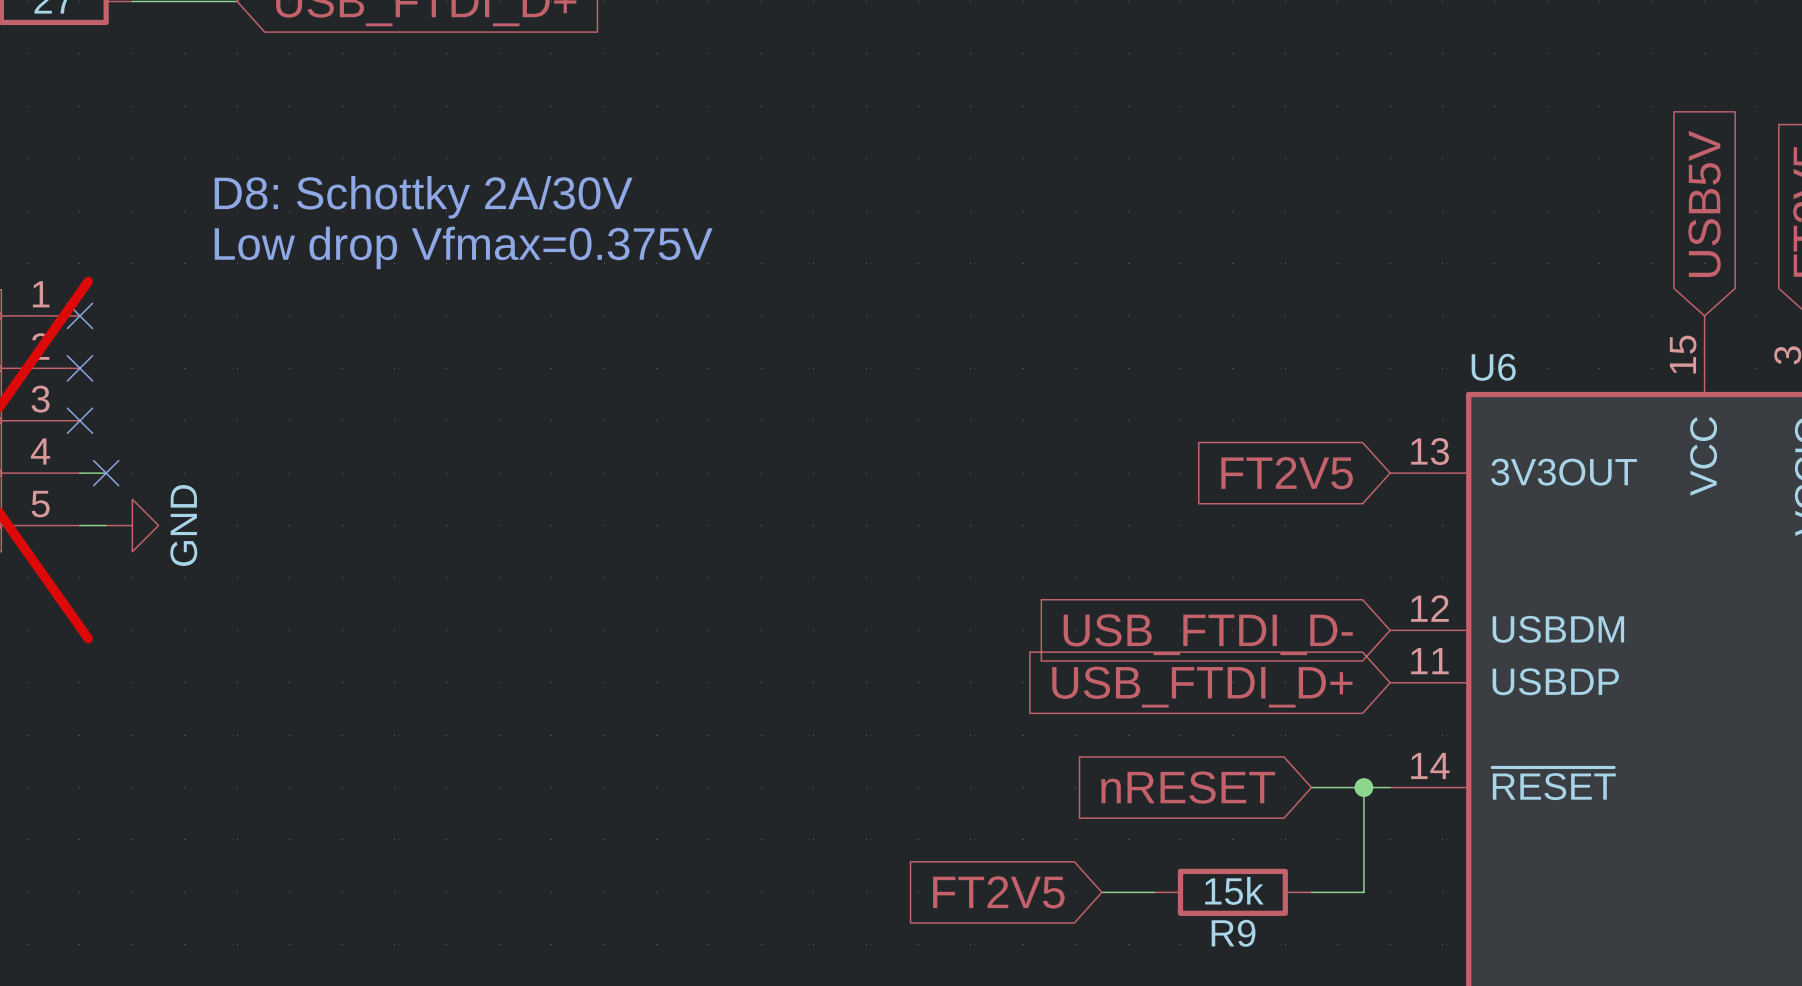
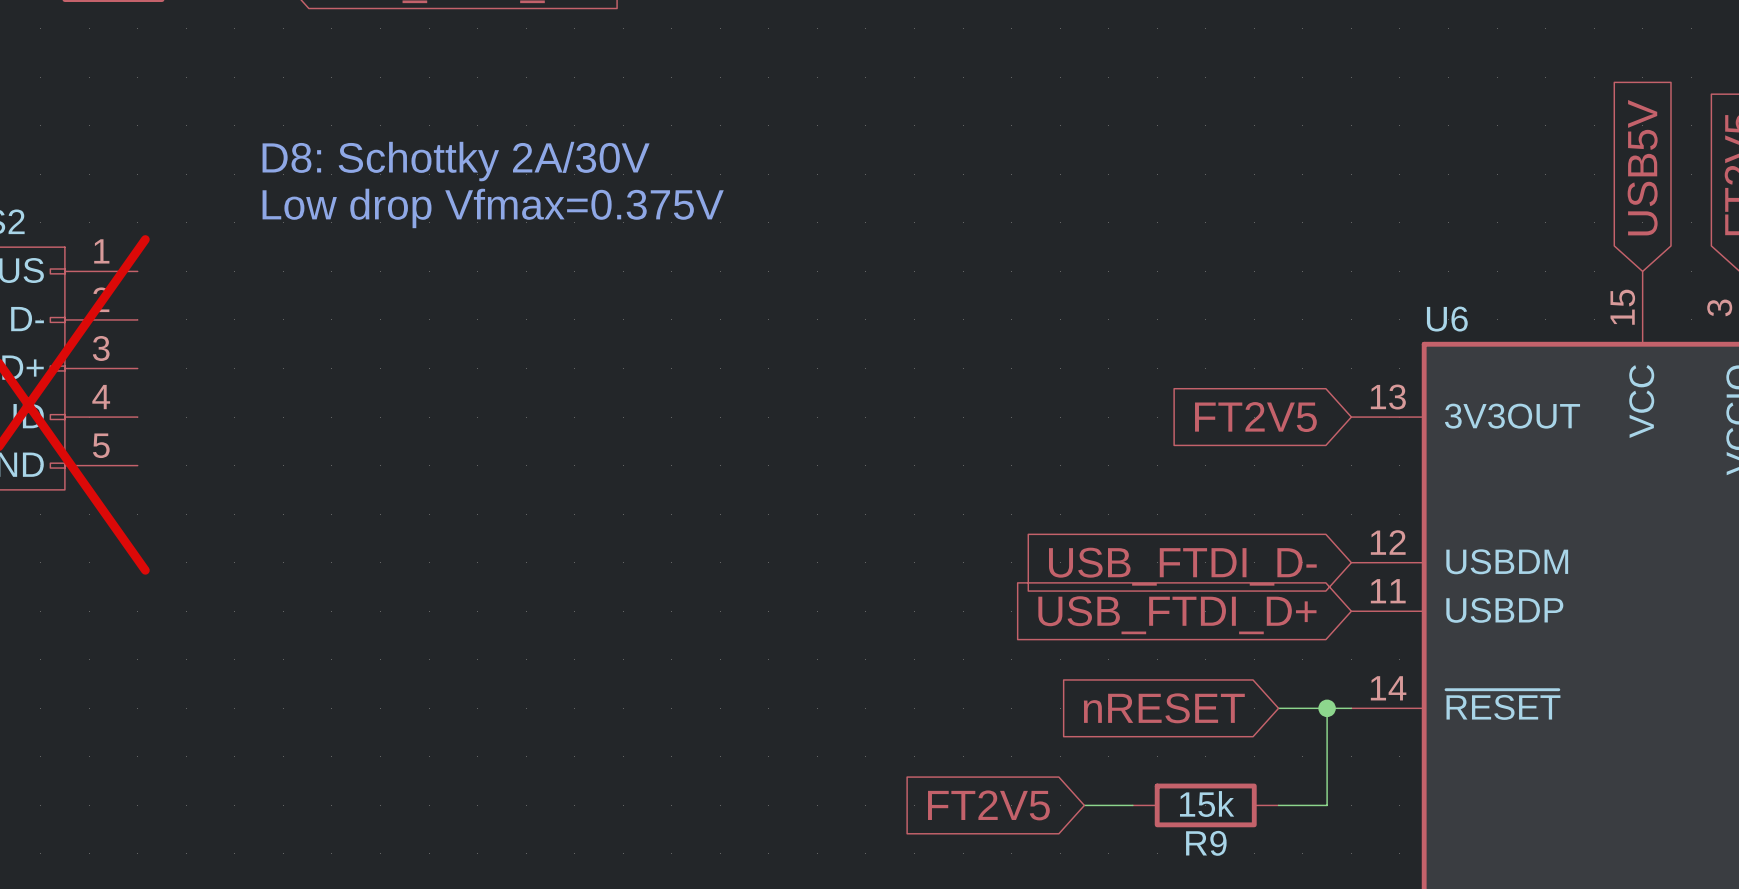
no-connect mark: (79, 315) -> none
no-connect mark: (79, 368) -> none
no-connect mark: (79, 420) -> none
wire: (79, 473) (106, 473) -> none
no-connect mark: (106, 473) -> none
wire: (79, 525) (106, 525) -> none
power symbol: GND (132, 525) -> none

